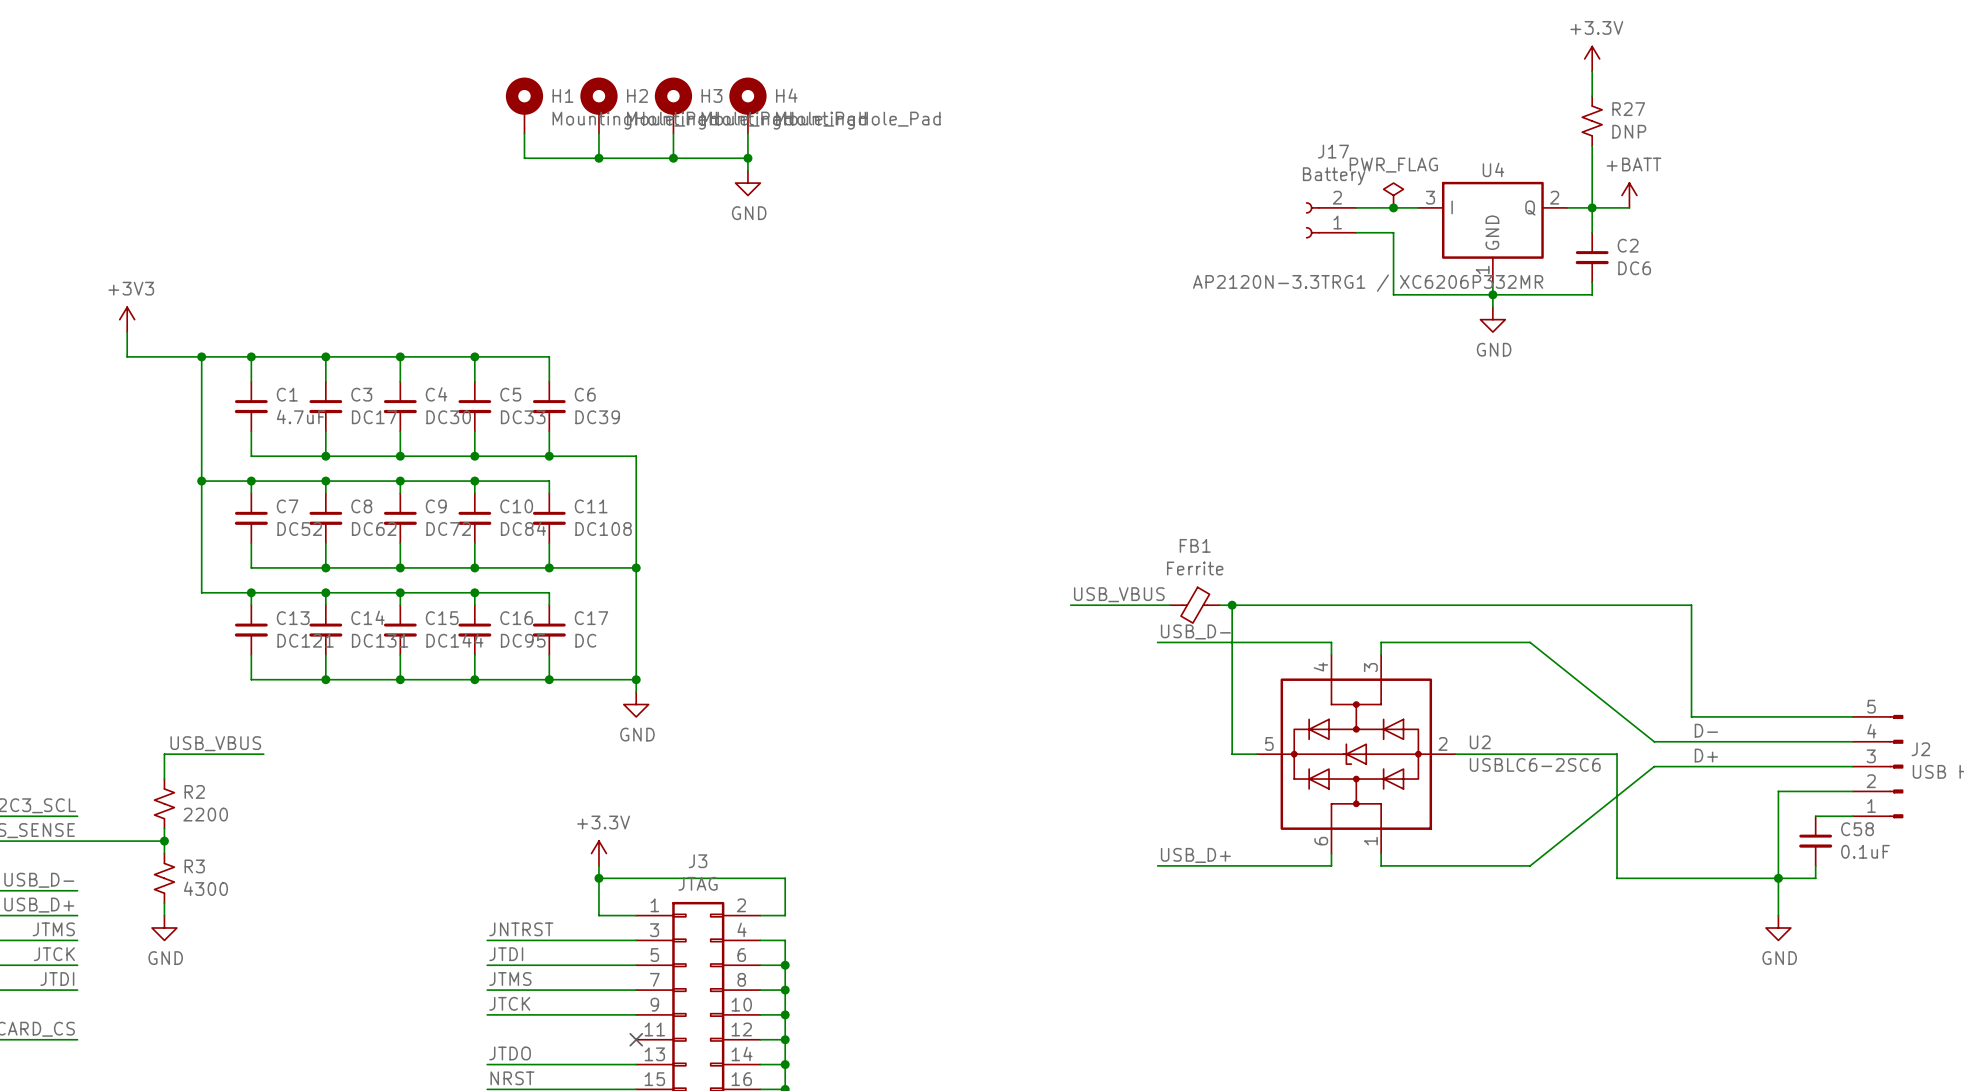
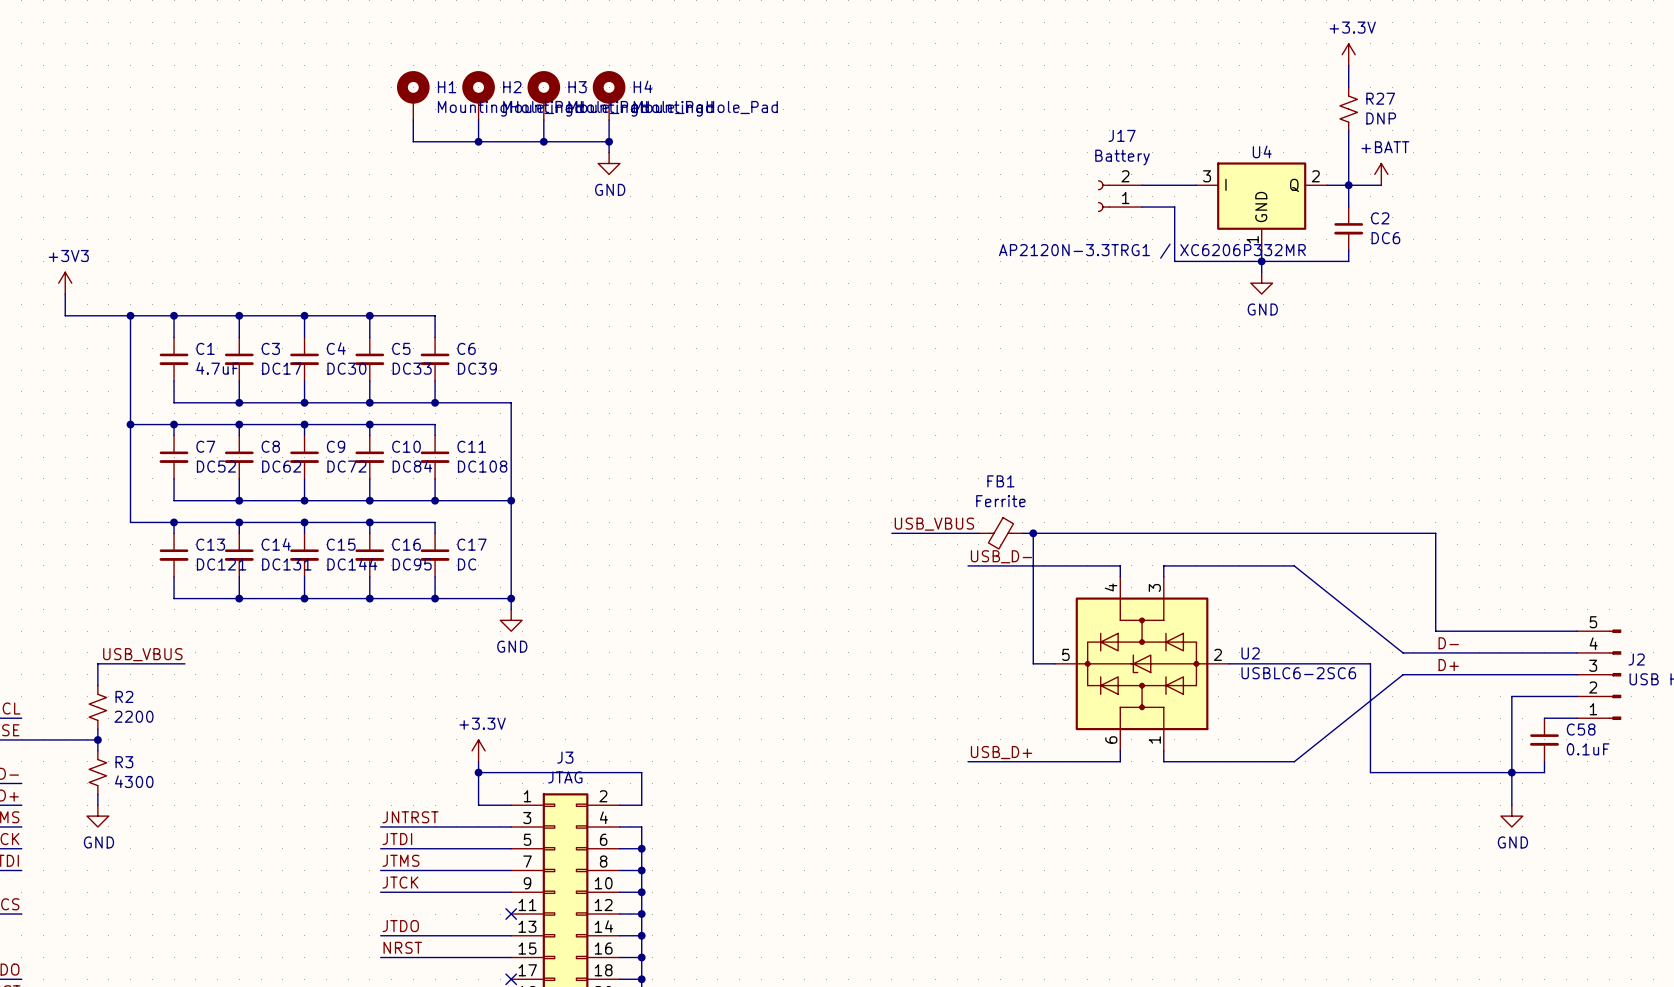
power symbol: PWR_FLAG (1393, 195) -> none
junction: (1393, 207) -> none

